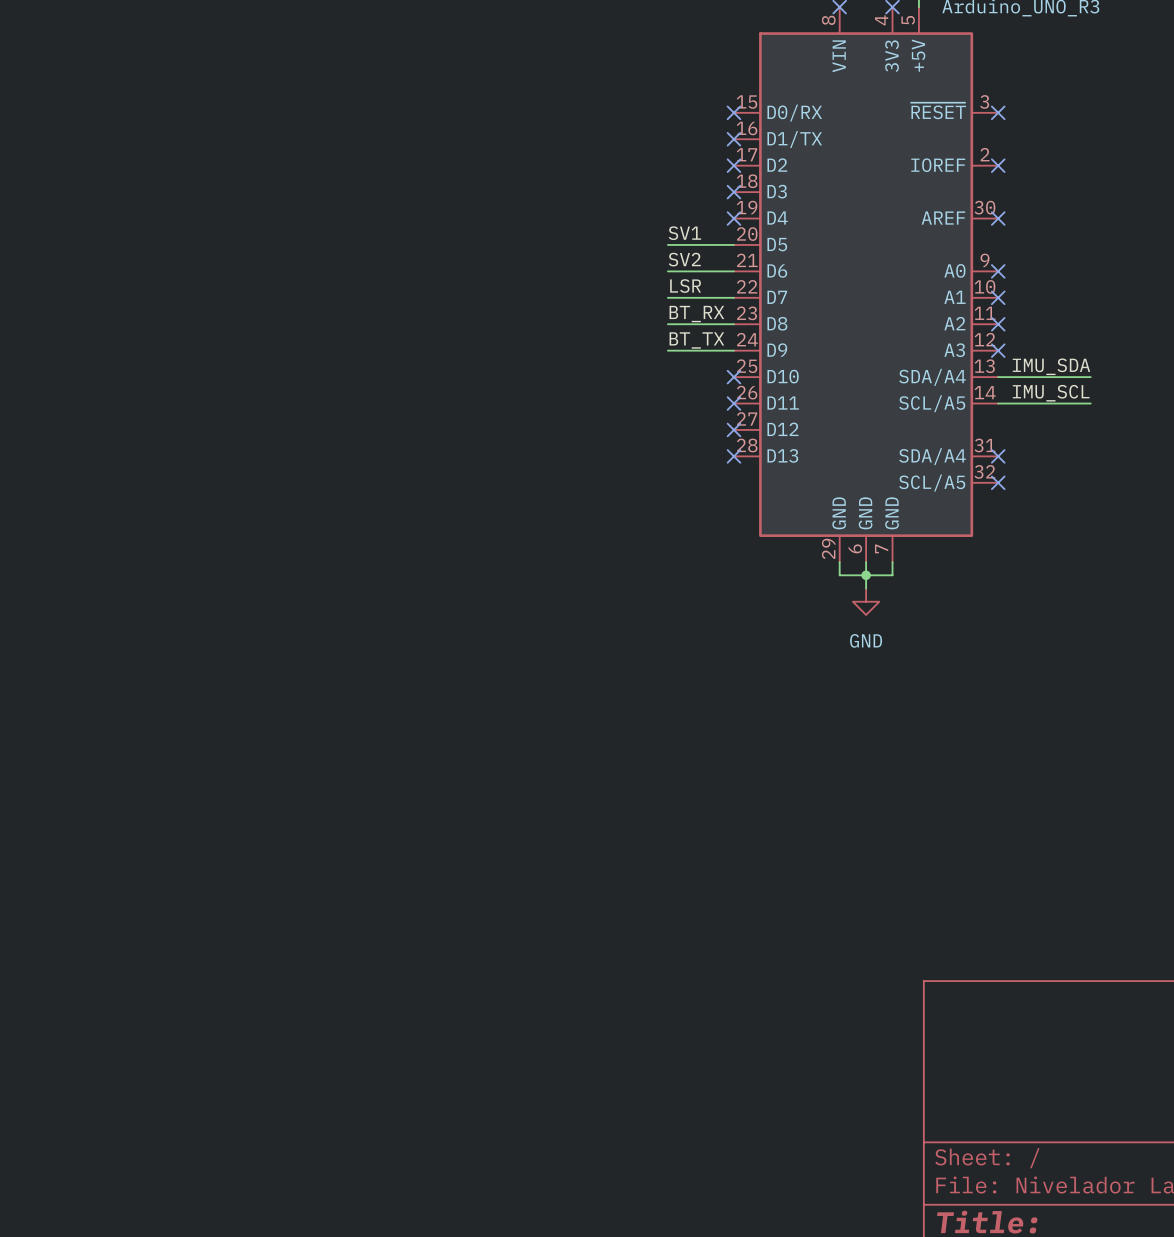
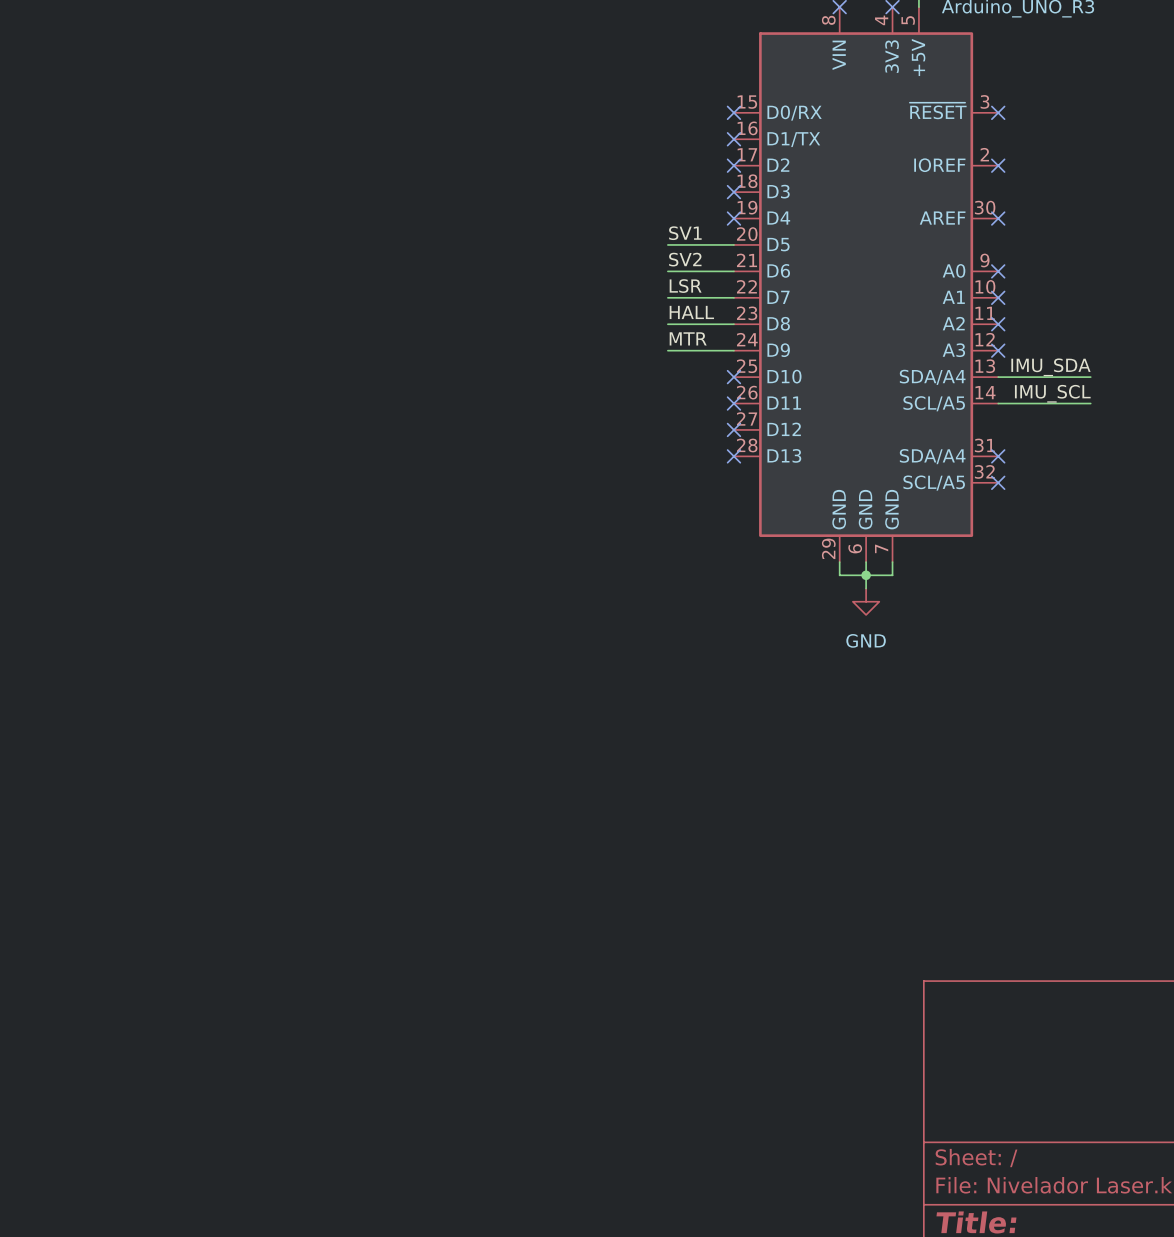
label: BT_RX (696, 314) -> HALL (691, 312)
label: BT_TX (696, 340) -> MTR (688, 338)

